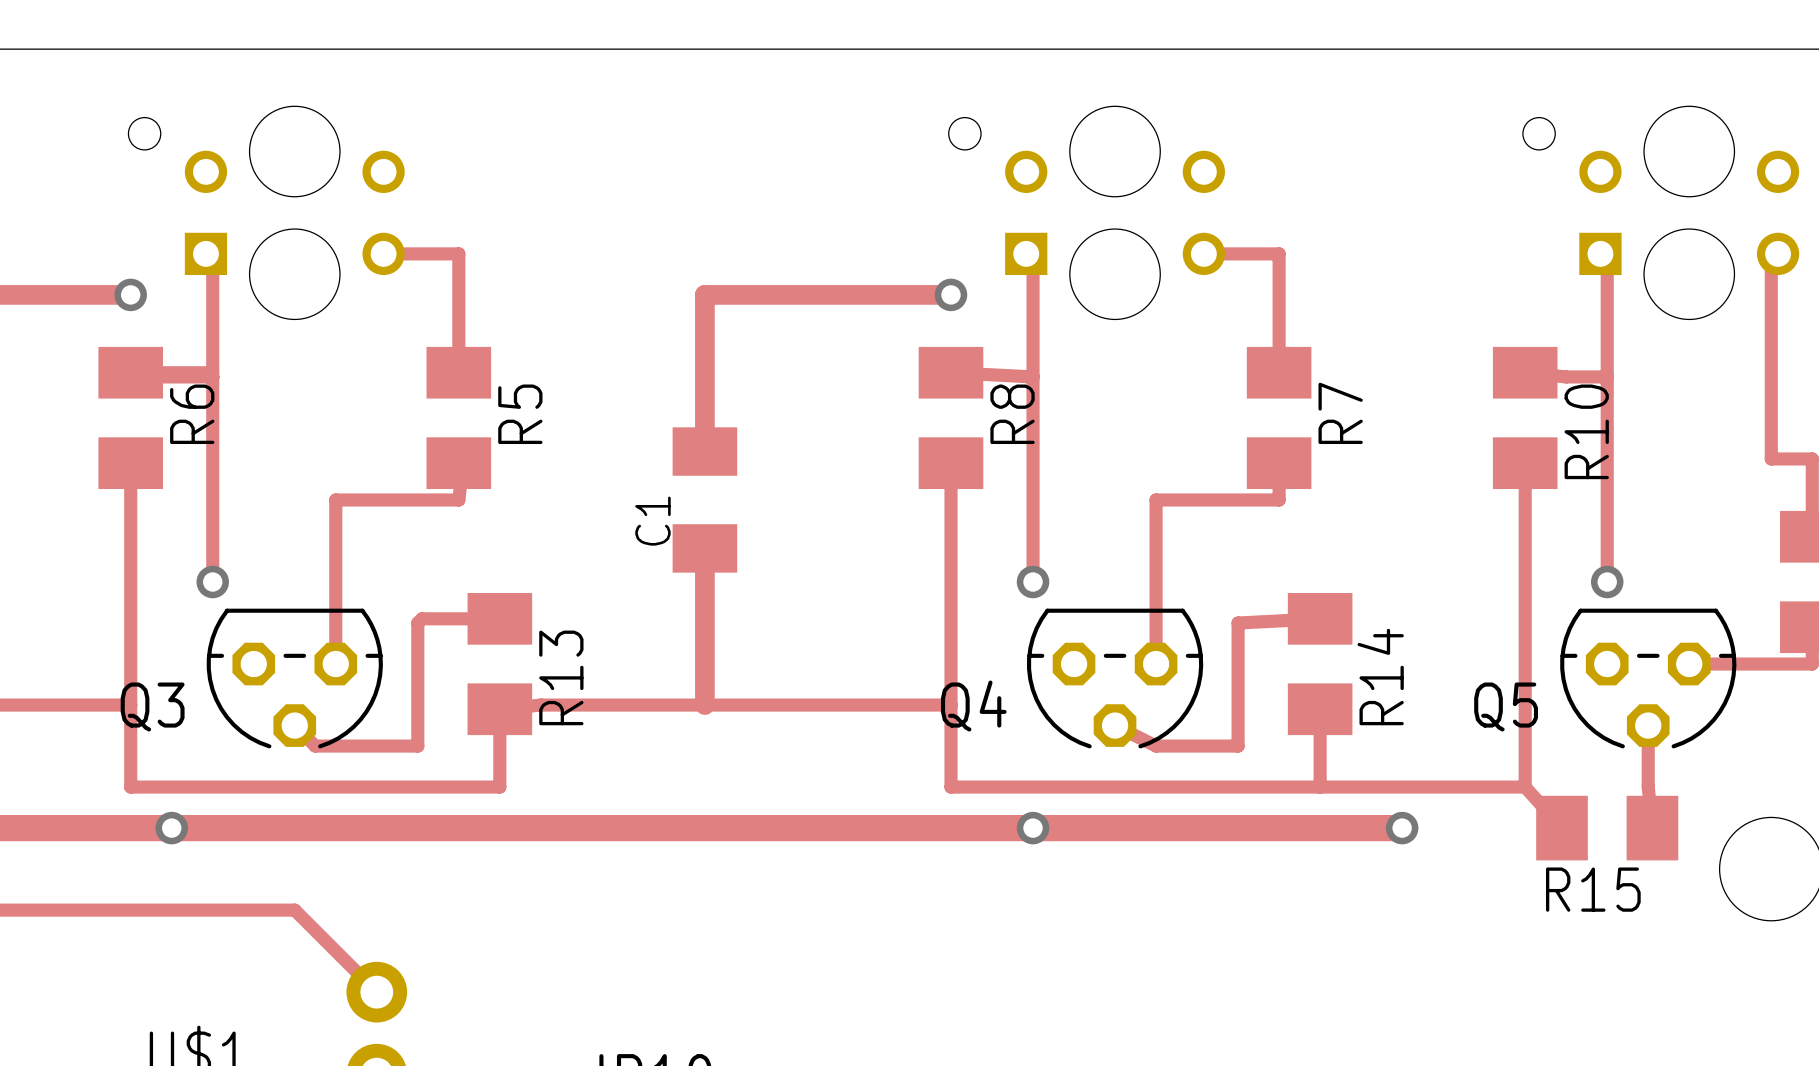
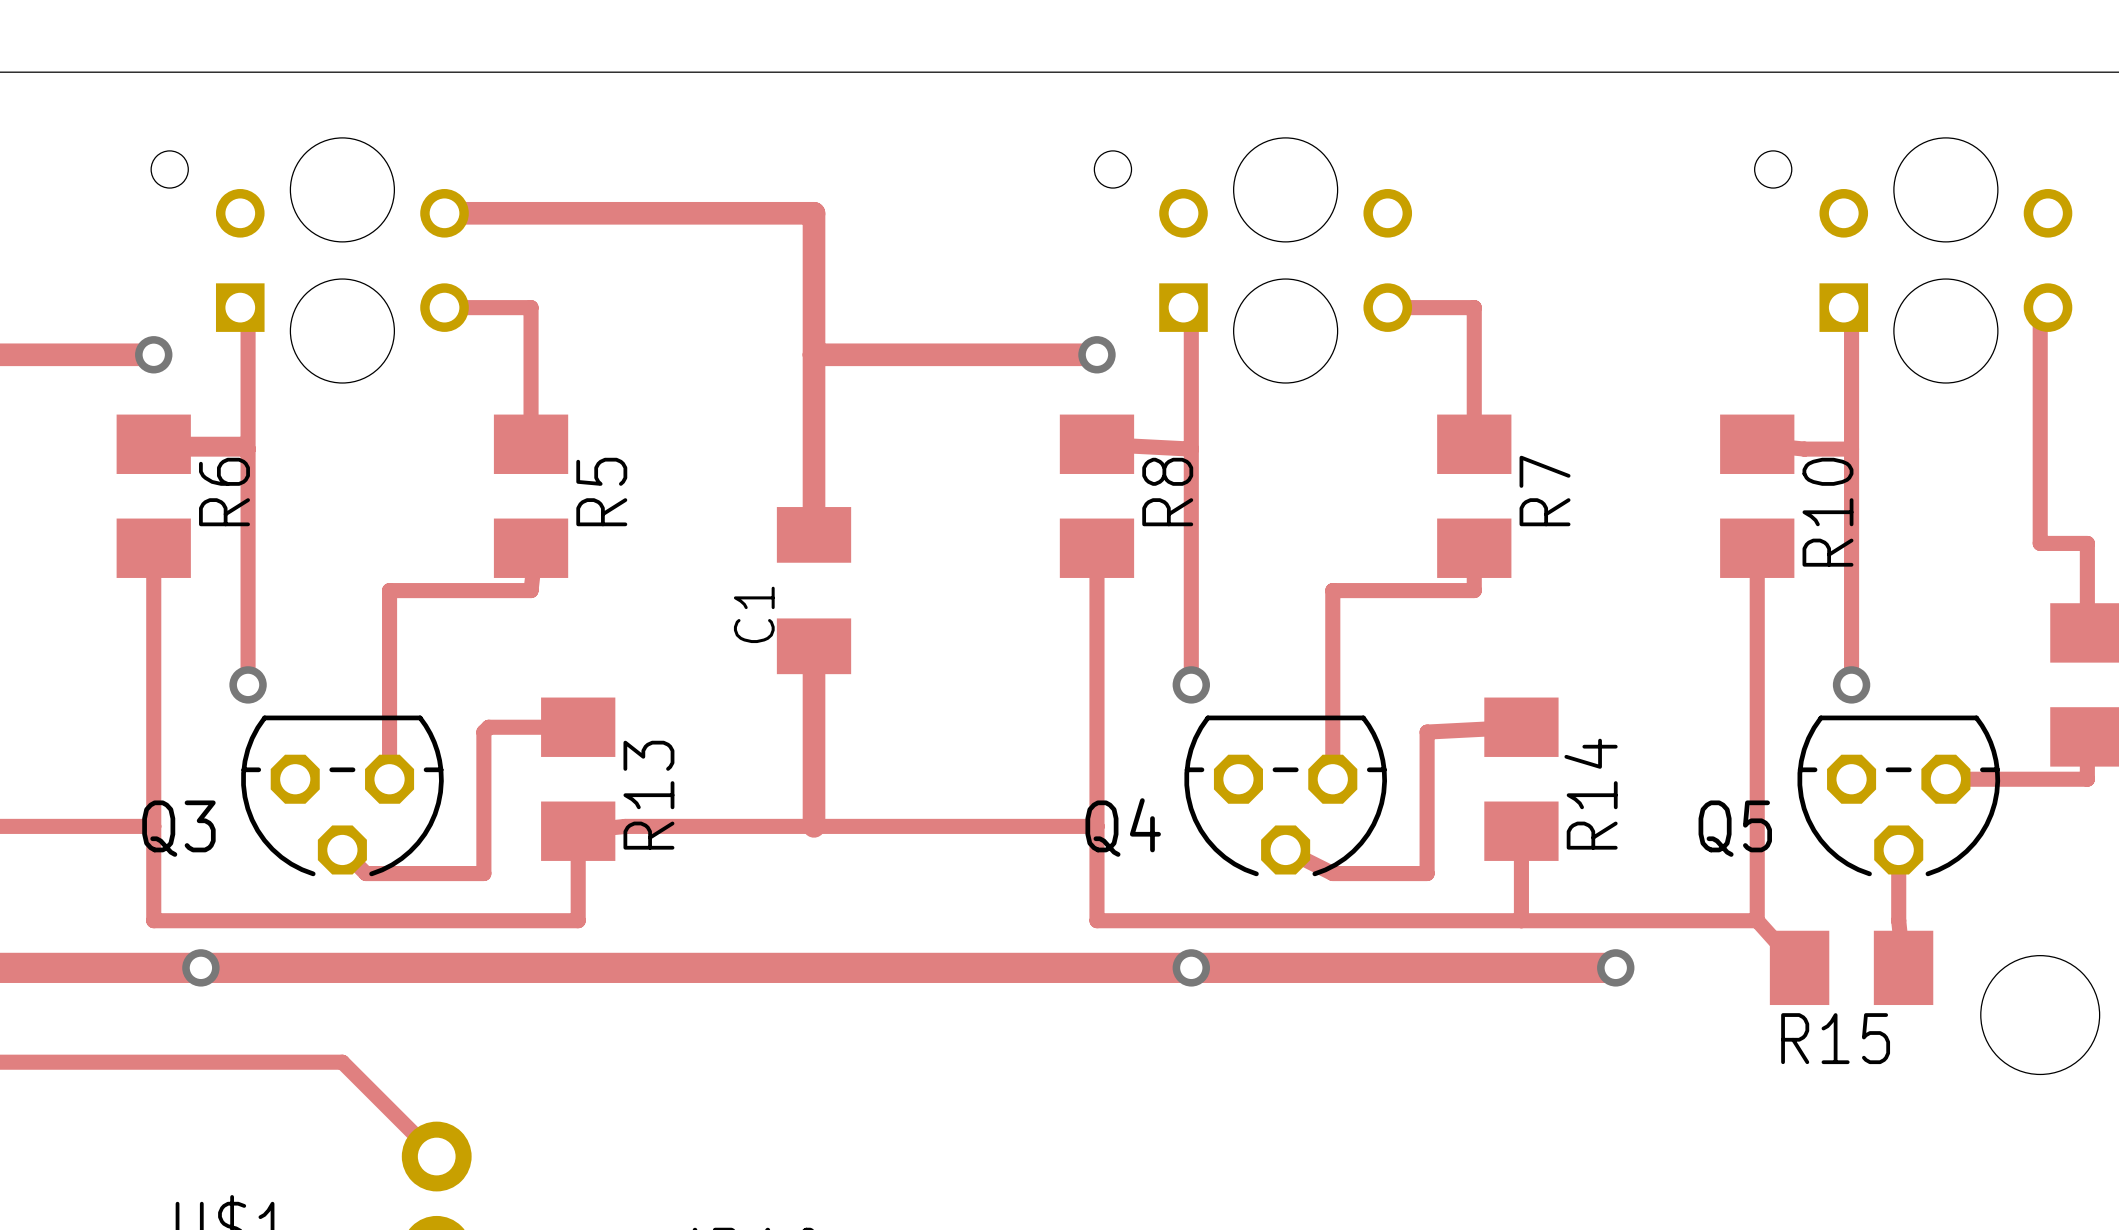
track: none -> (444, 213) (814, 213) (814, 354)

